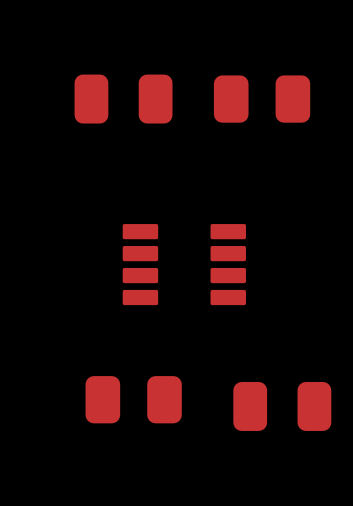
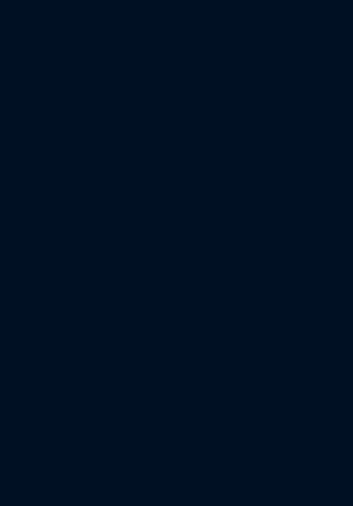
part: (123, 99) -> none
part: (262, 99) -> none
part: (184, 264) -> none
part: (133, 399) -> none
part: (282, 406) -> none

